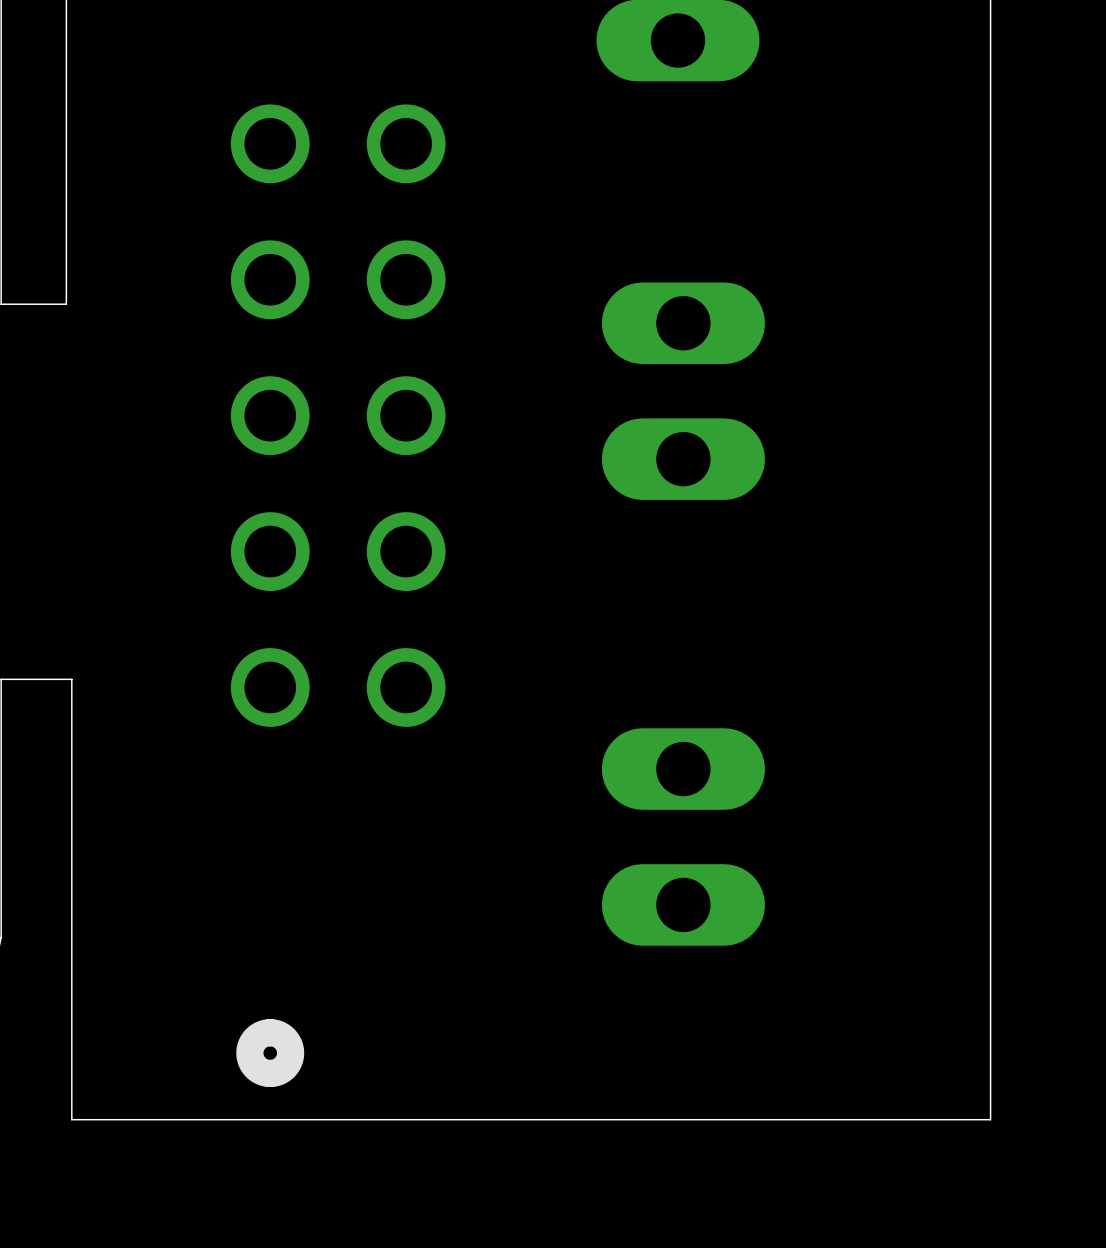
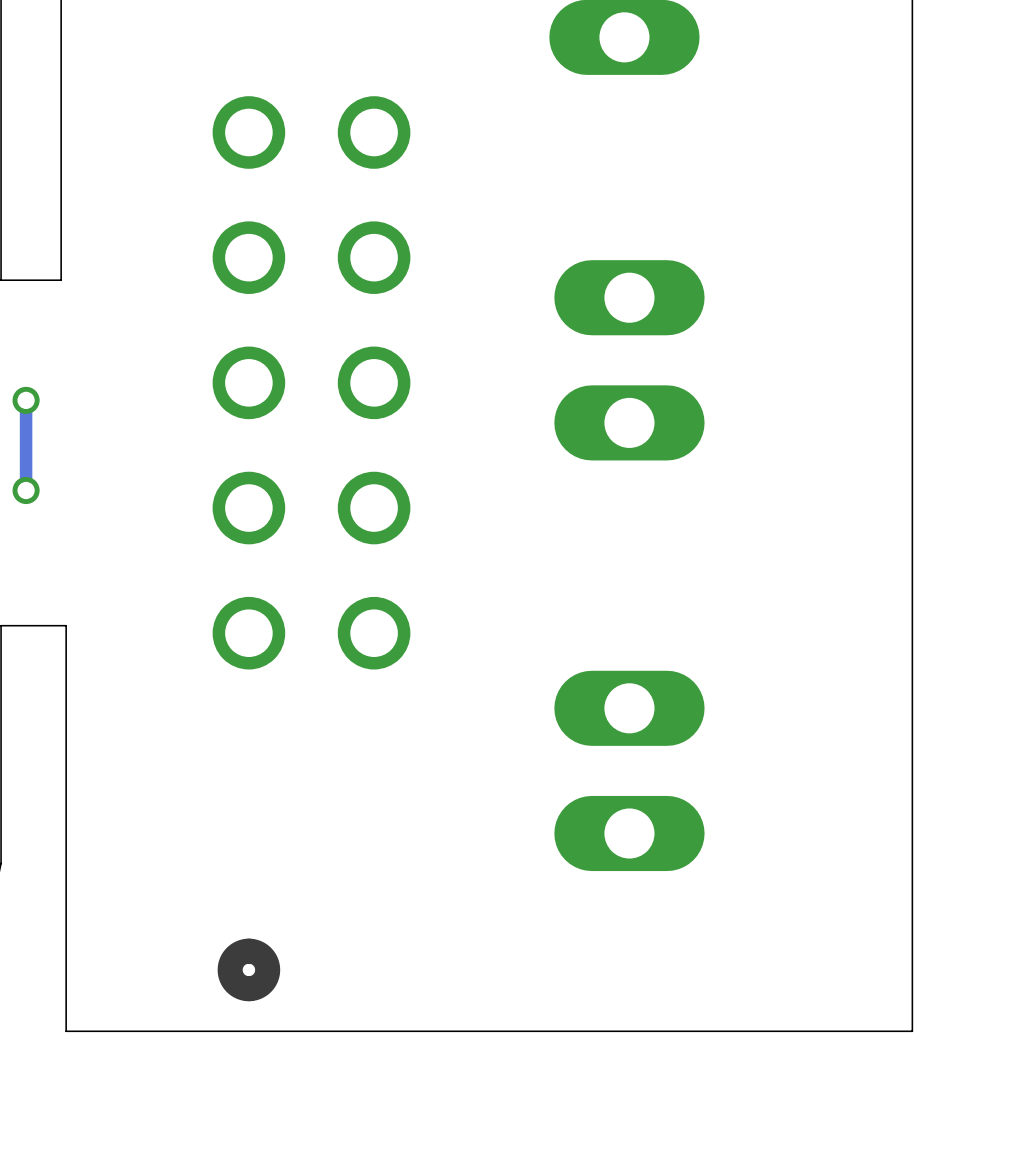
track: none -> (26, 400) (26, 490)
via: none -> (26, 400)
via: none -> (26, 490)

